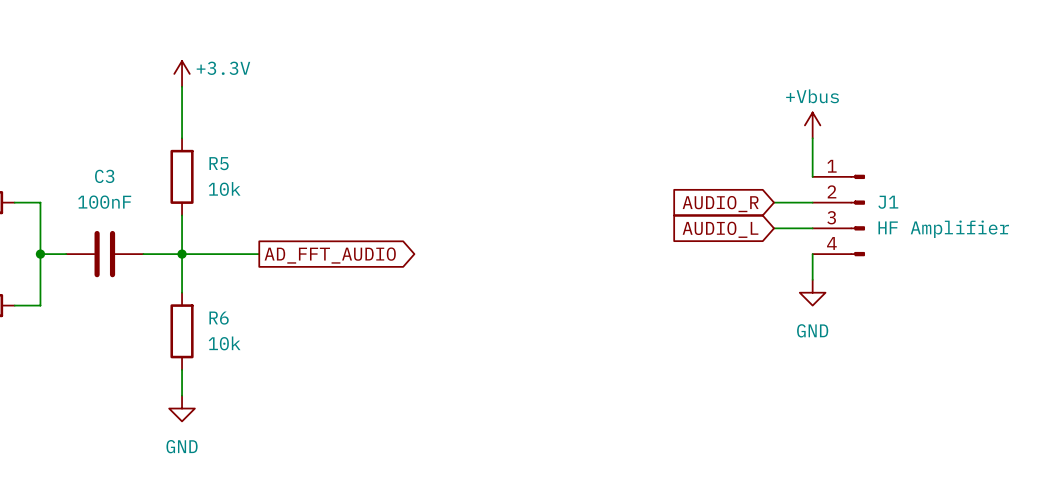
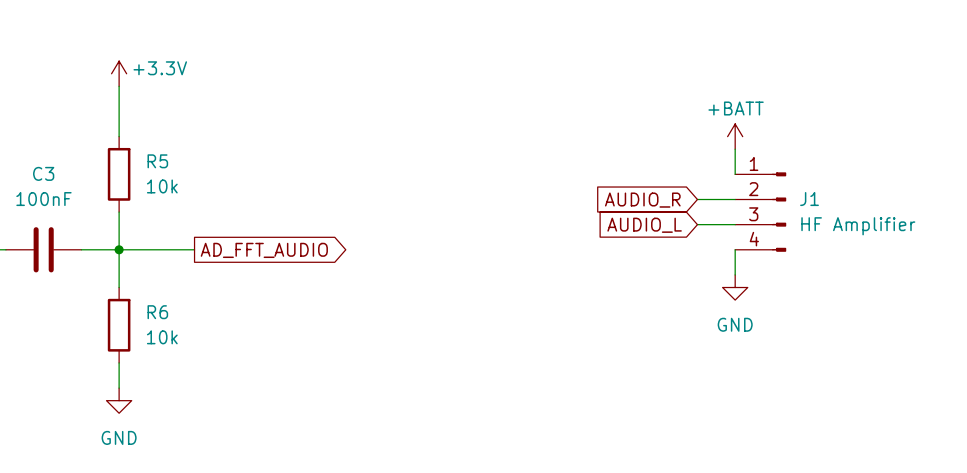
power symbol: +Vbus (812, 125) -> none
power symbol: none -> +BATT (735, 136)

